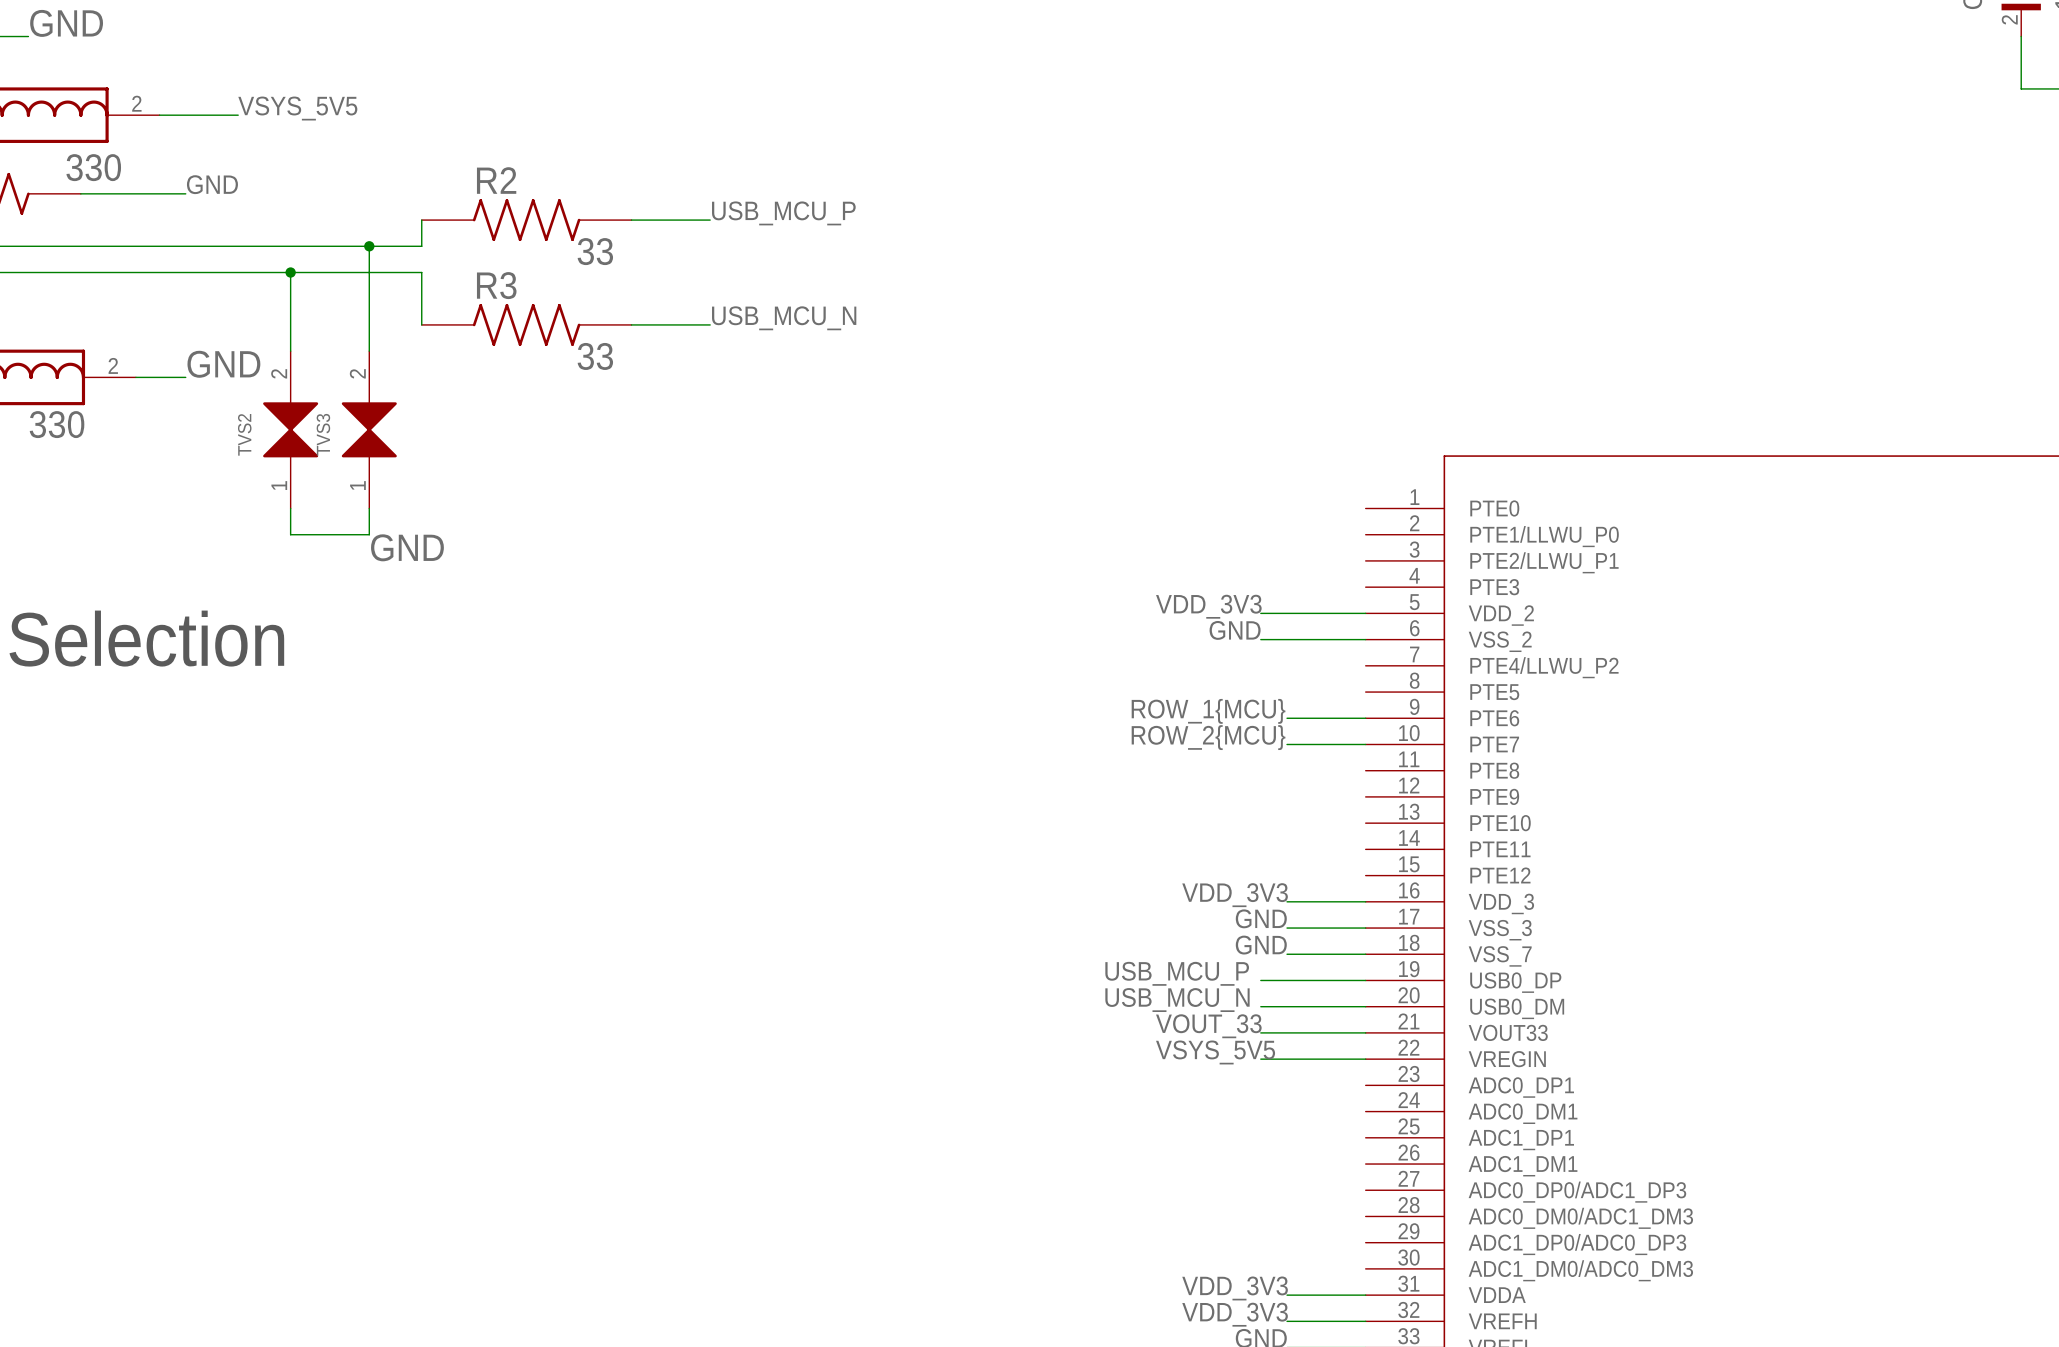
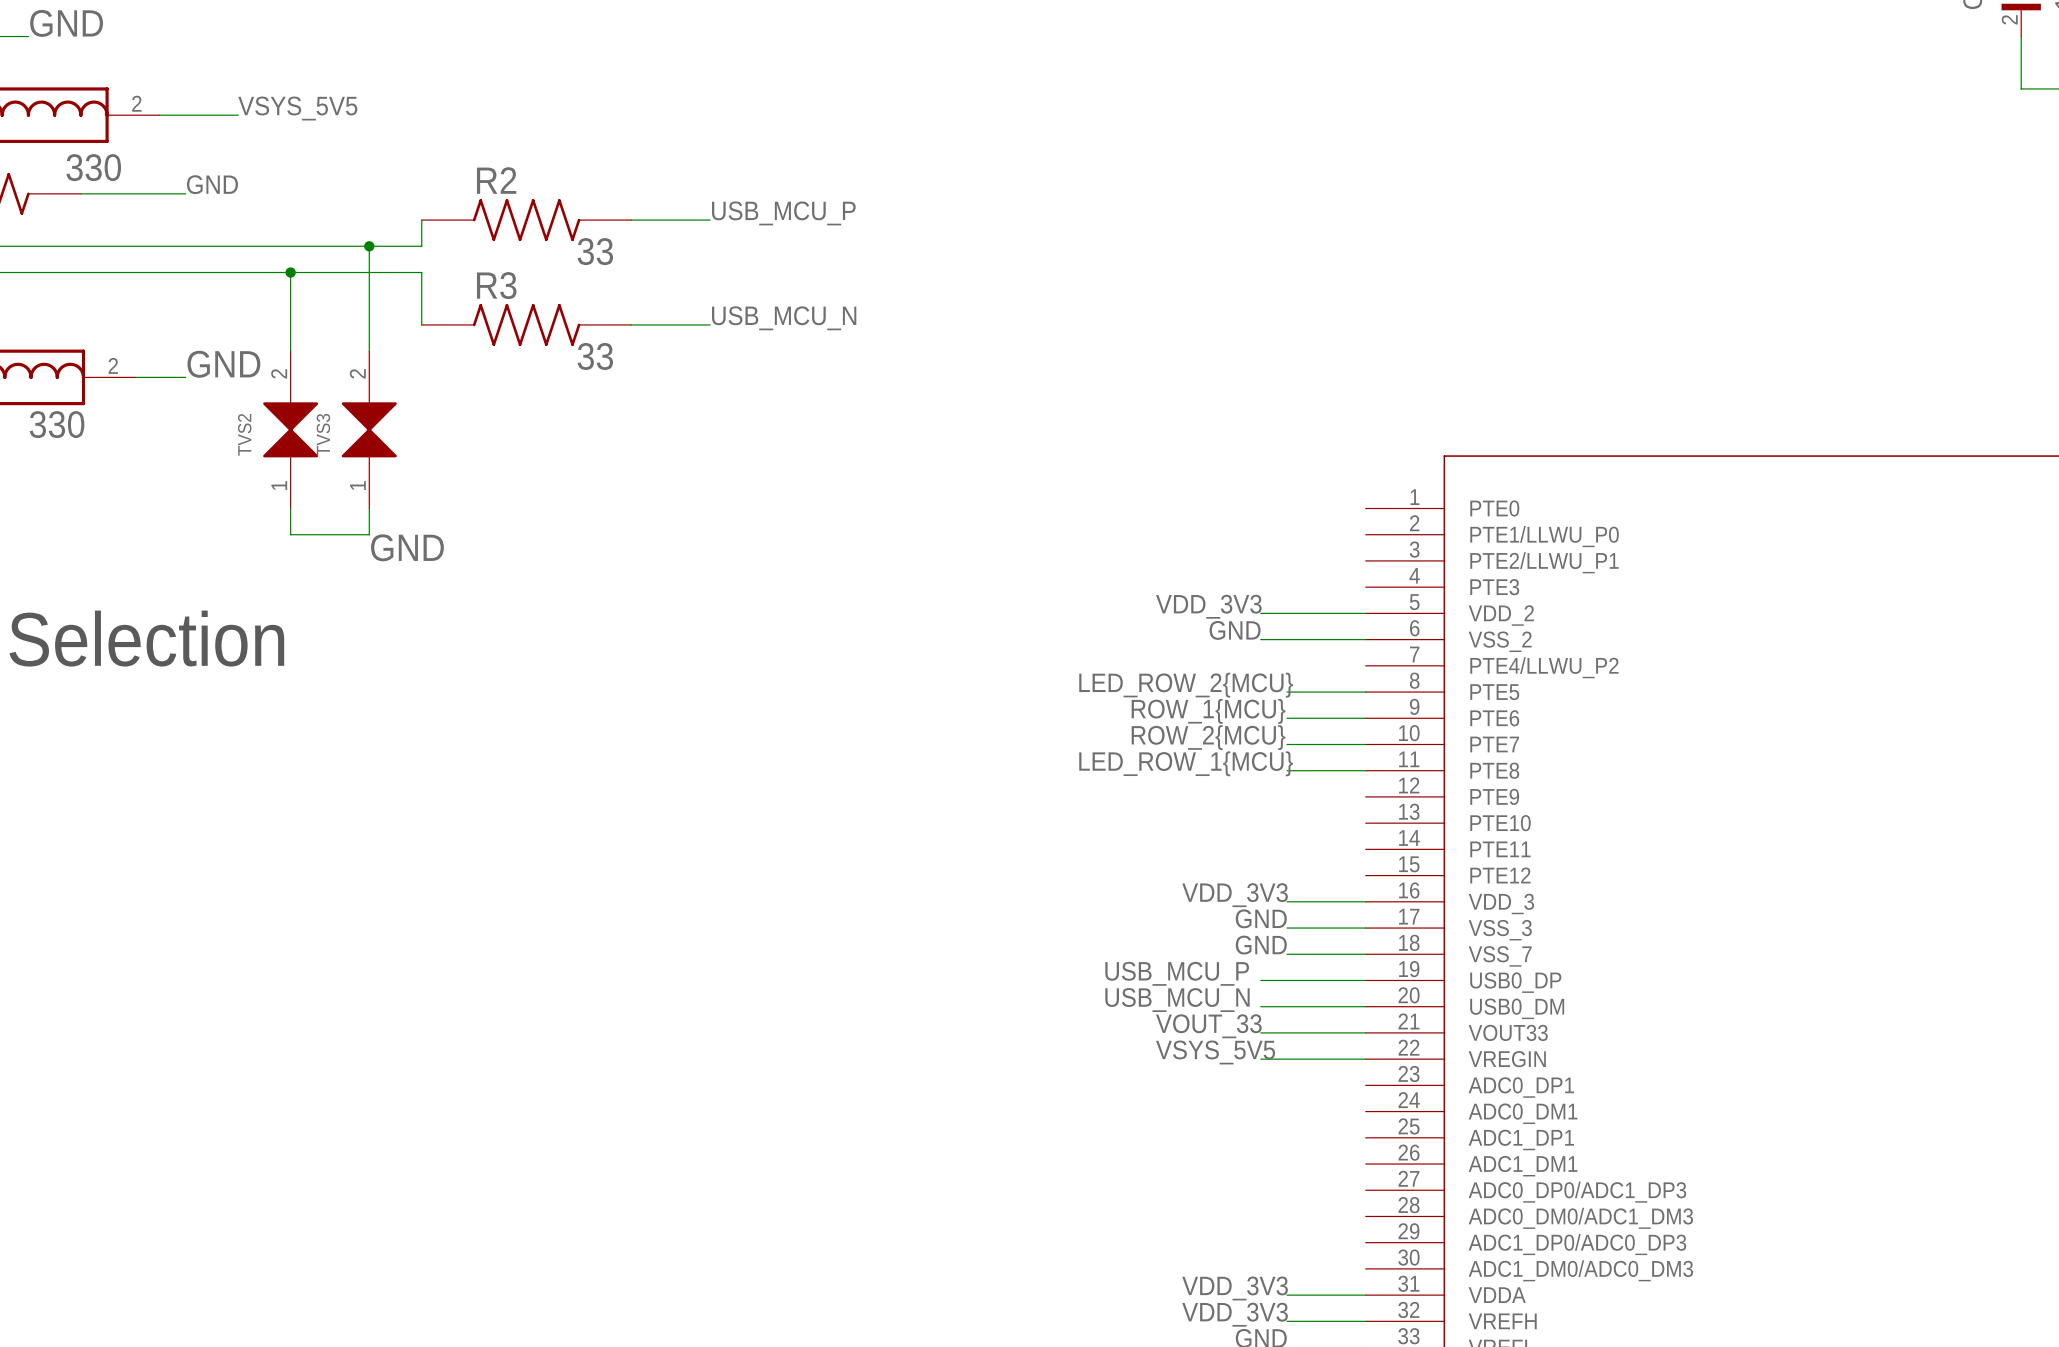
label: none -> LED_ROW_2{MCU} (1186, 685)
wire: none -> (1287, 692) (1365, 692)
label: none -> LED_ROW_1{MCU} (1186, 763)
wire: none -> (1287, 770) (1365, 770)

